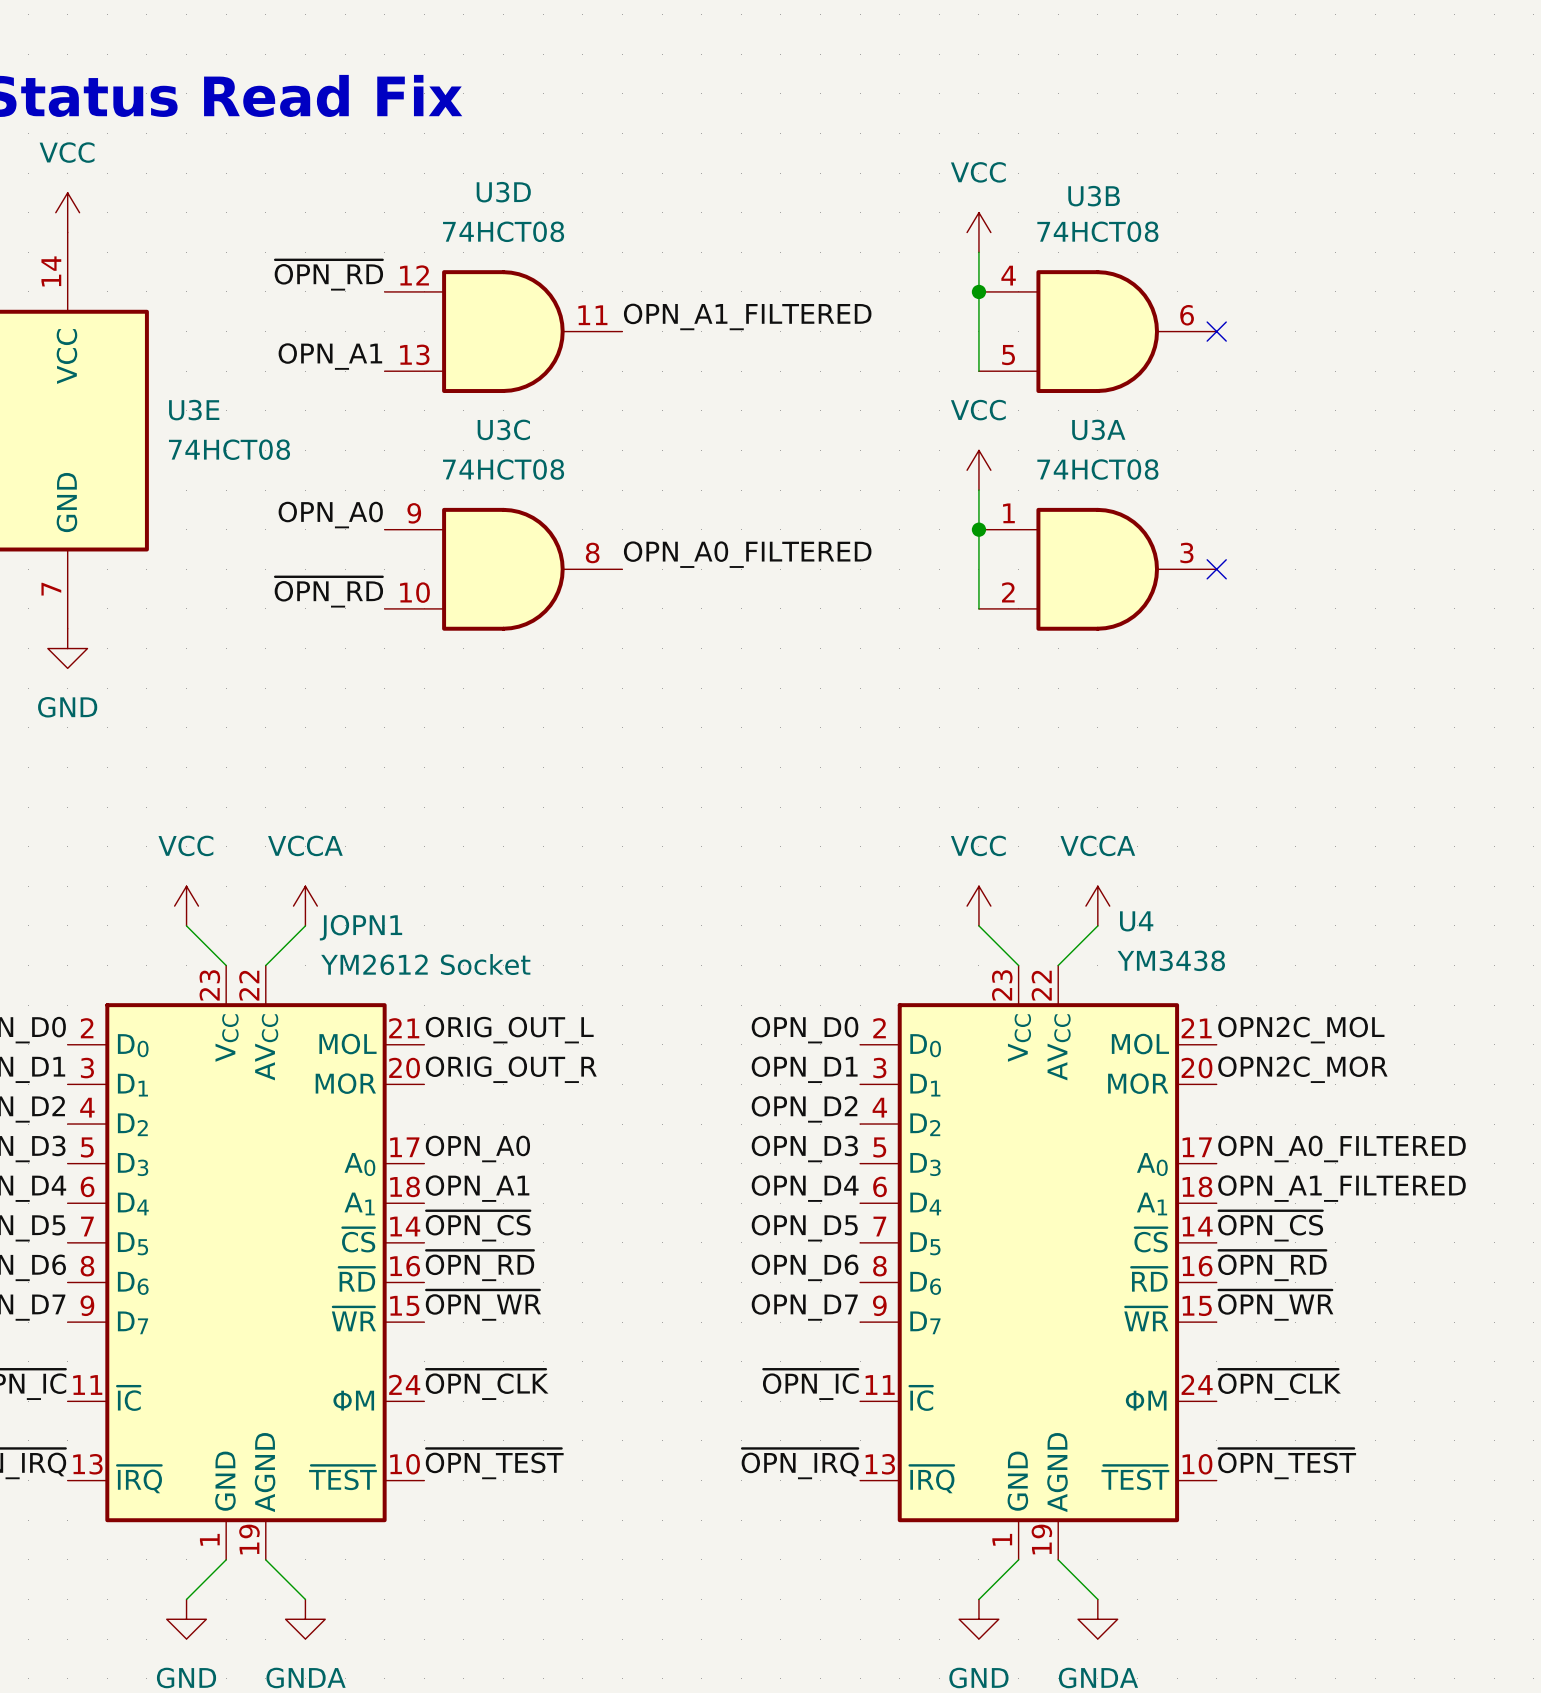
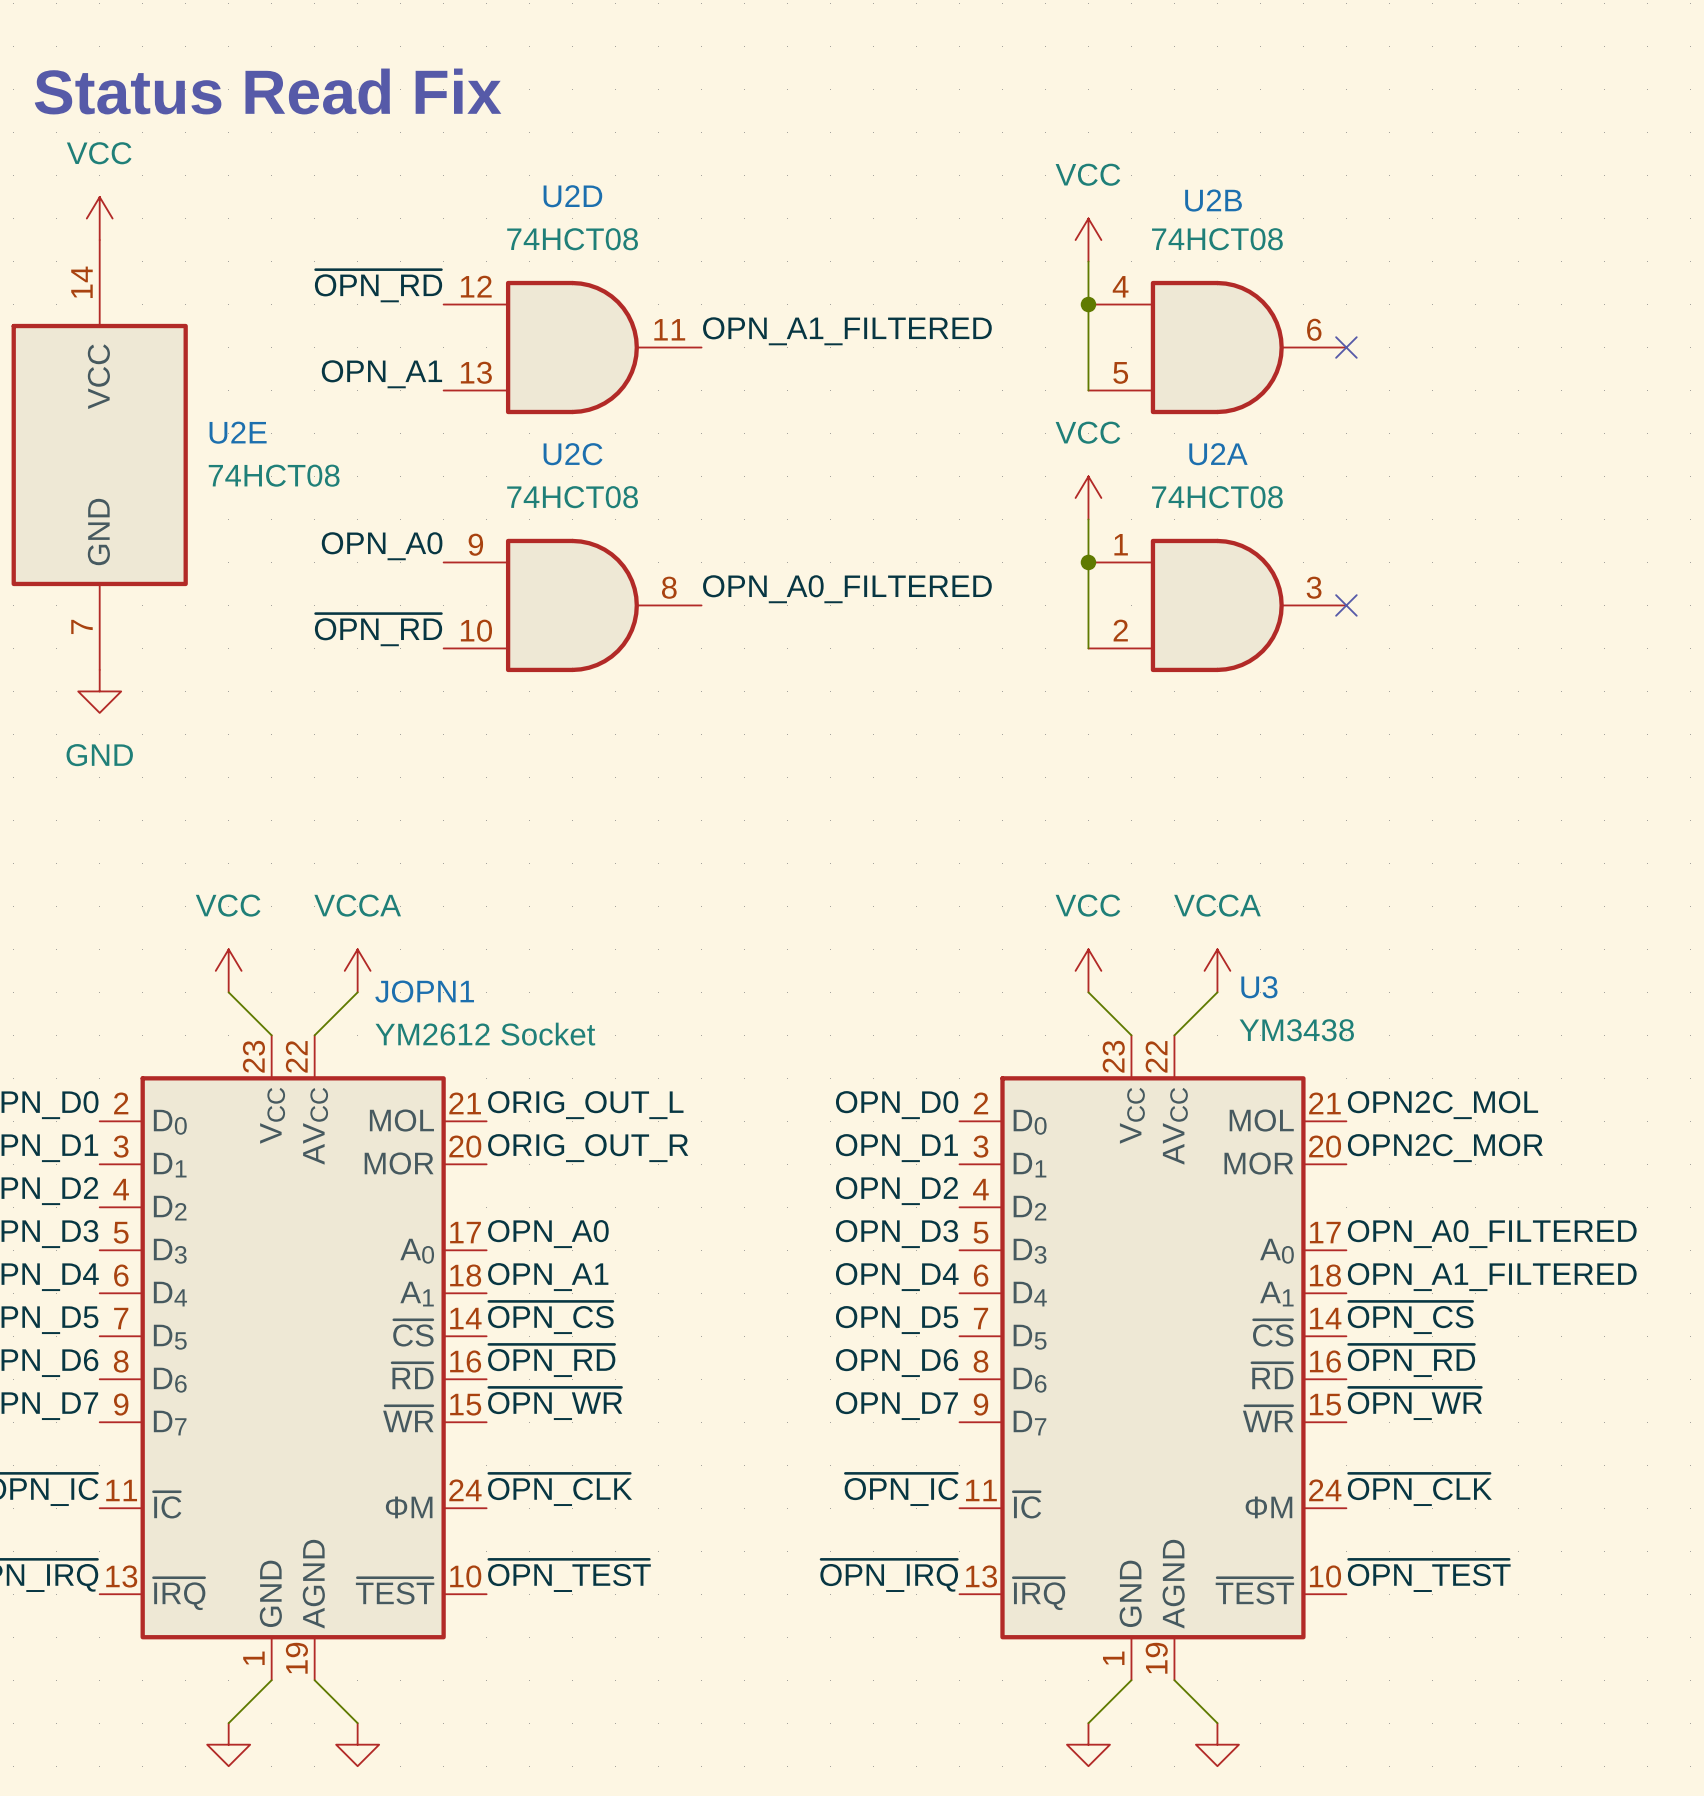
U3D name: U3D (503, 192) -> U2D (572, 196)
U3B name: U3B (1094, 196) -> U2B (1213, 200)
U3E name: U3E (194, 410) -> U2E (238, 432)
U3C name: U3C (503, 429) -> U2C (573, 454)
U3A name: U3A (1098, 429) -> U2A (1218, 454)
U4 name: U4 (1136, 921) -> U3 (1259, 987)

